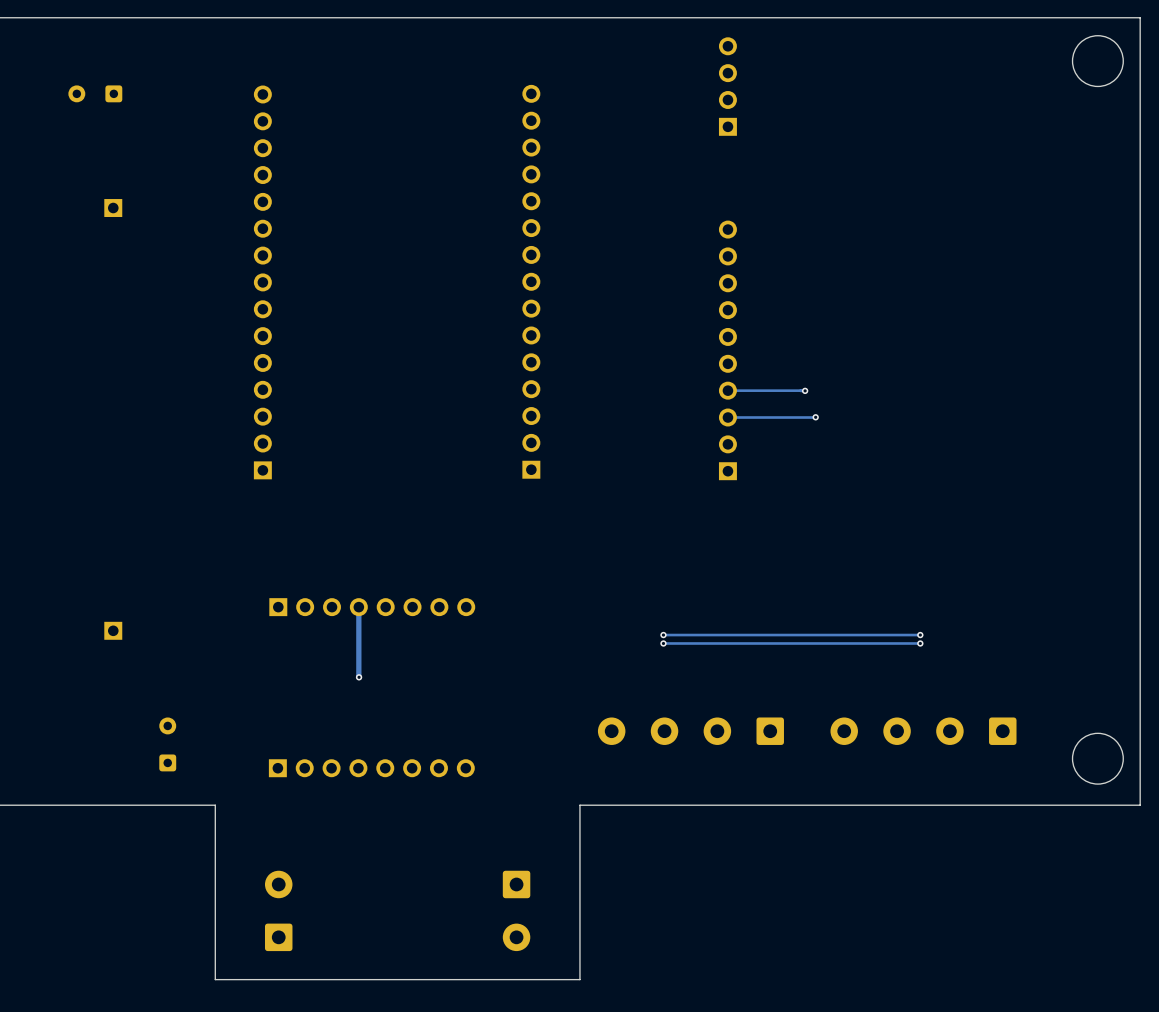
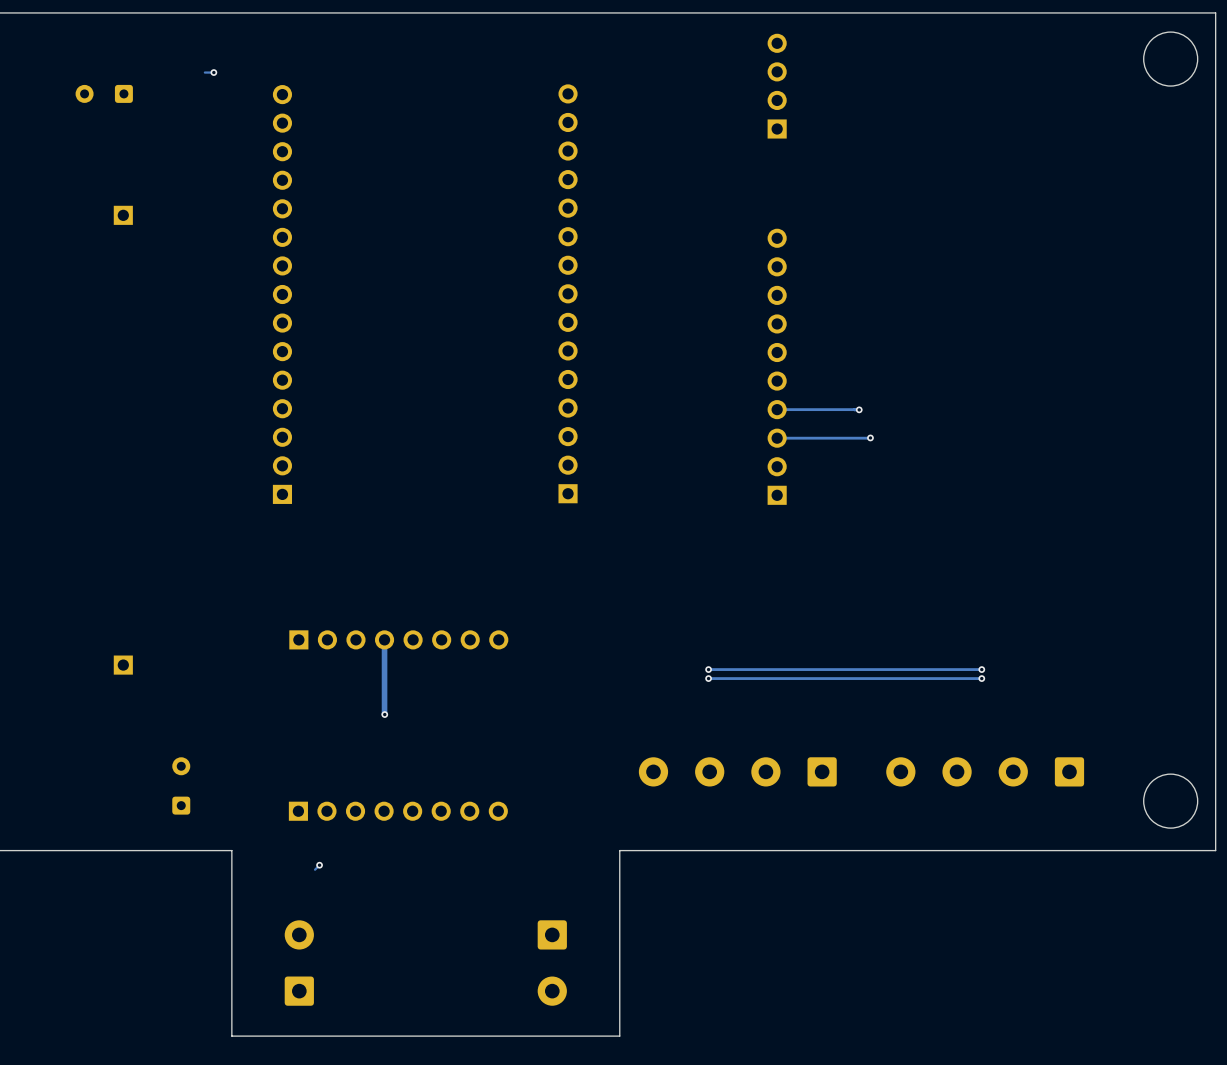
track: none -> (213, 72) (204, 72)
via: none -> (213, 72)
track: none -> (319, 865) (315, 869)
via: none -> (319, 865)

